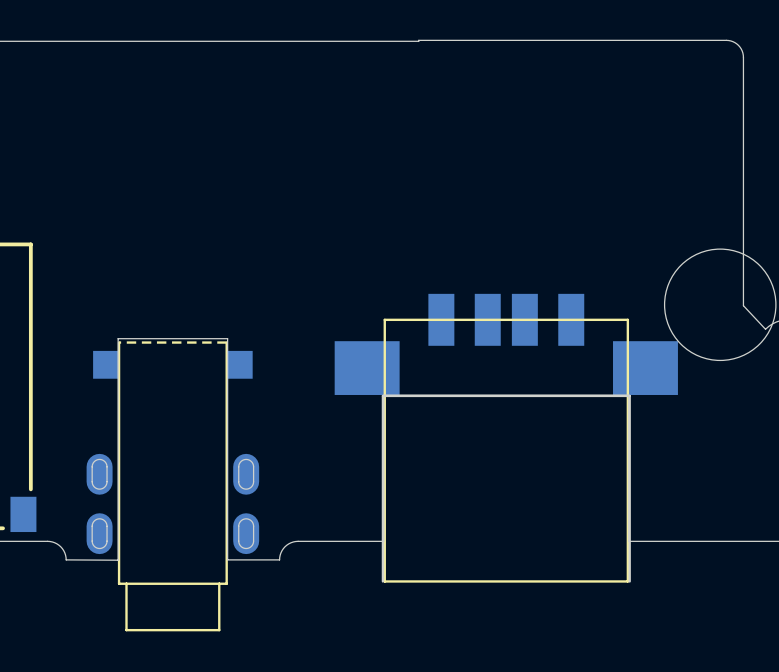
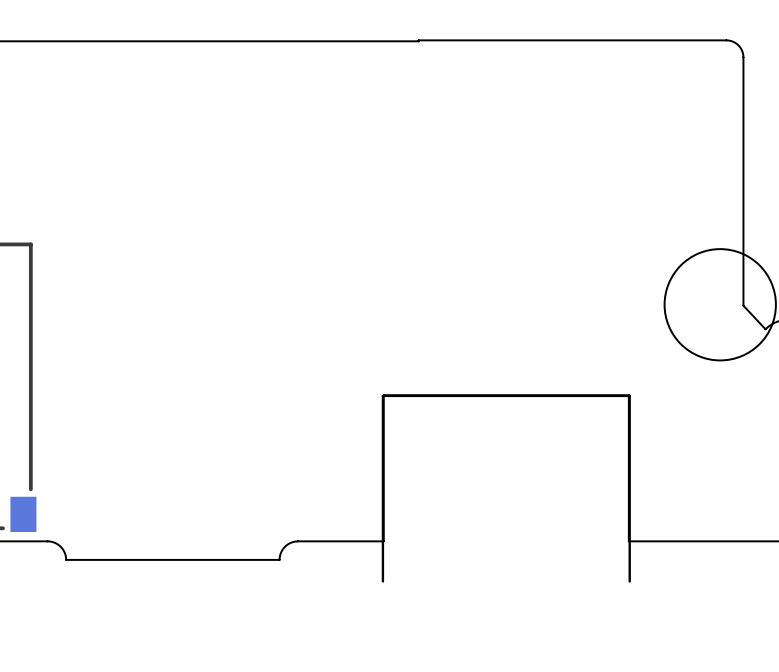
part: (506, 438) -> none
part: (172, 486) -> none
part: none -> (506, 488)
board edge: (227, 559) (227, 338) (118, 338) (118, 560) (66, 559) -> (227, 559) (66, 559)

